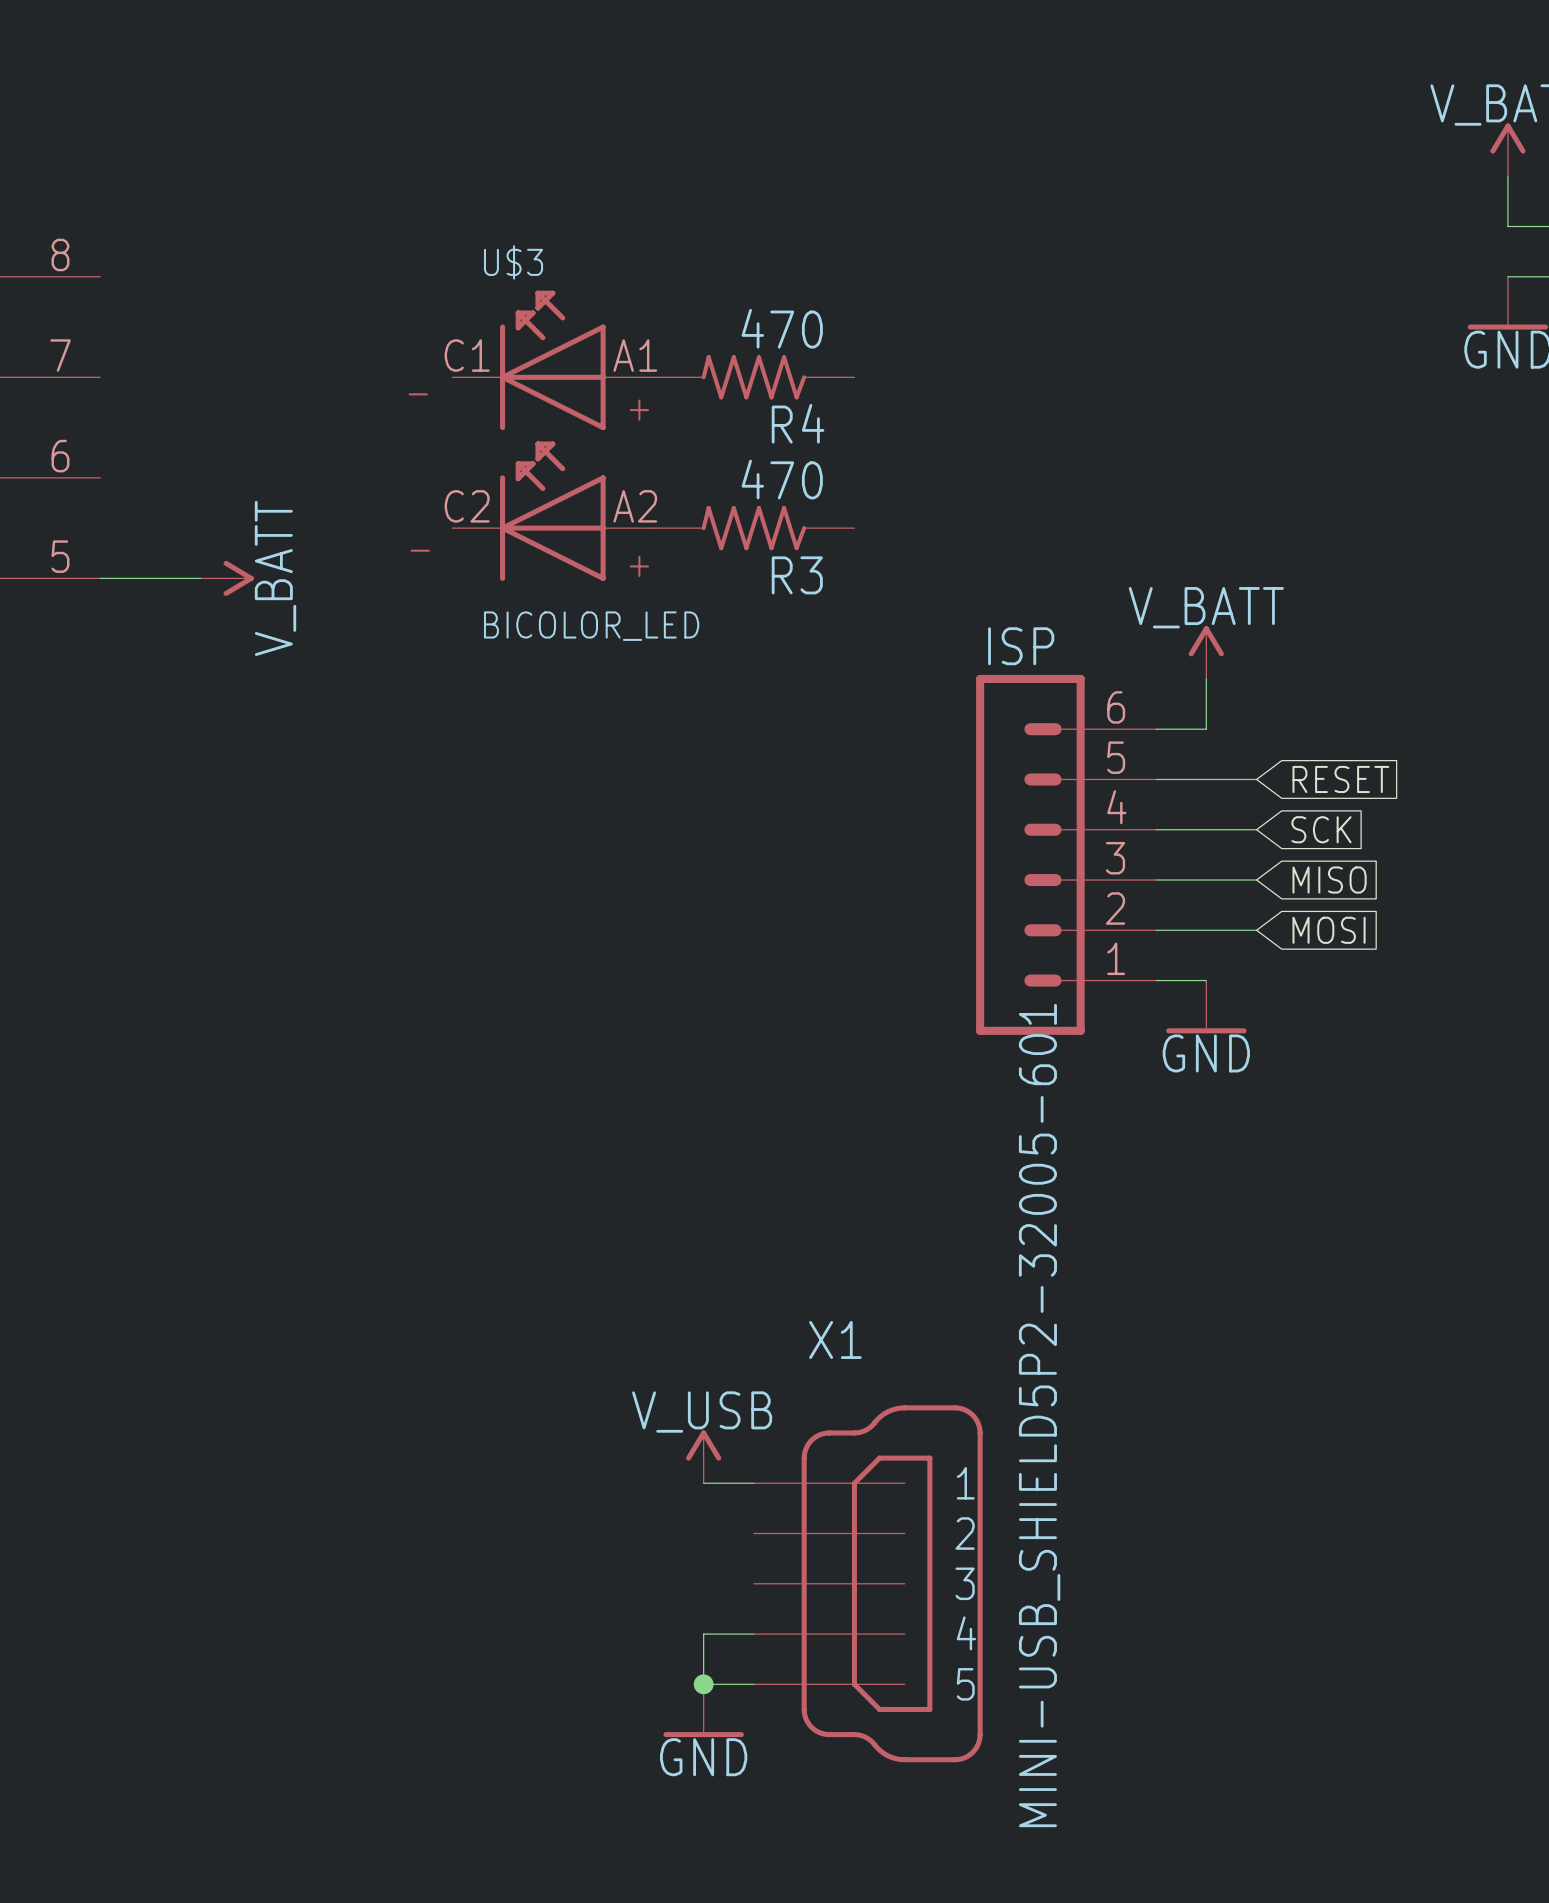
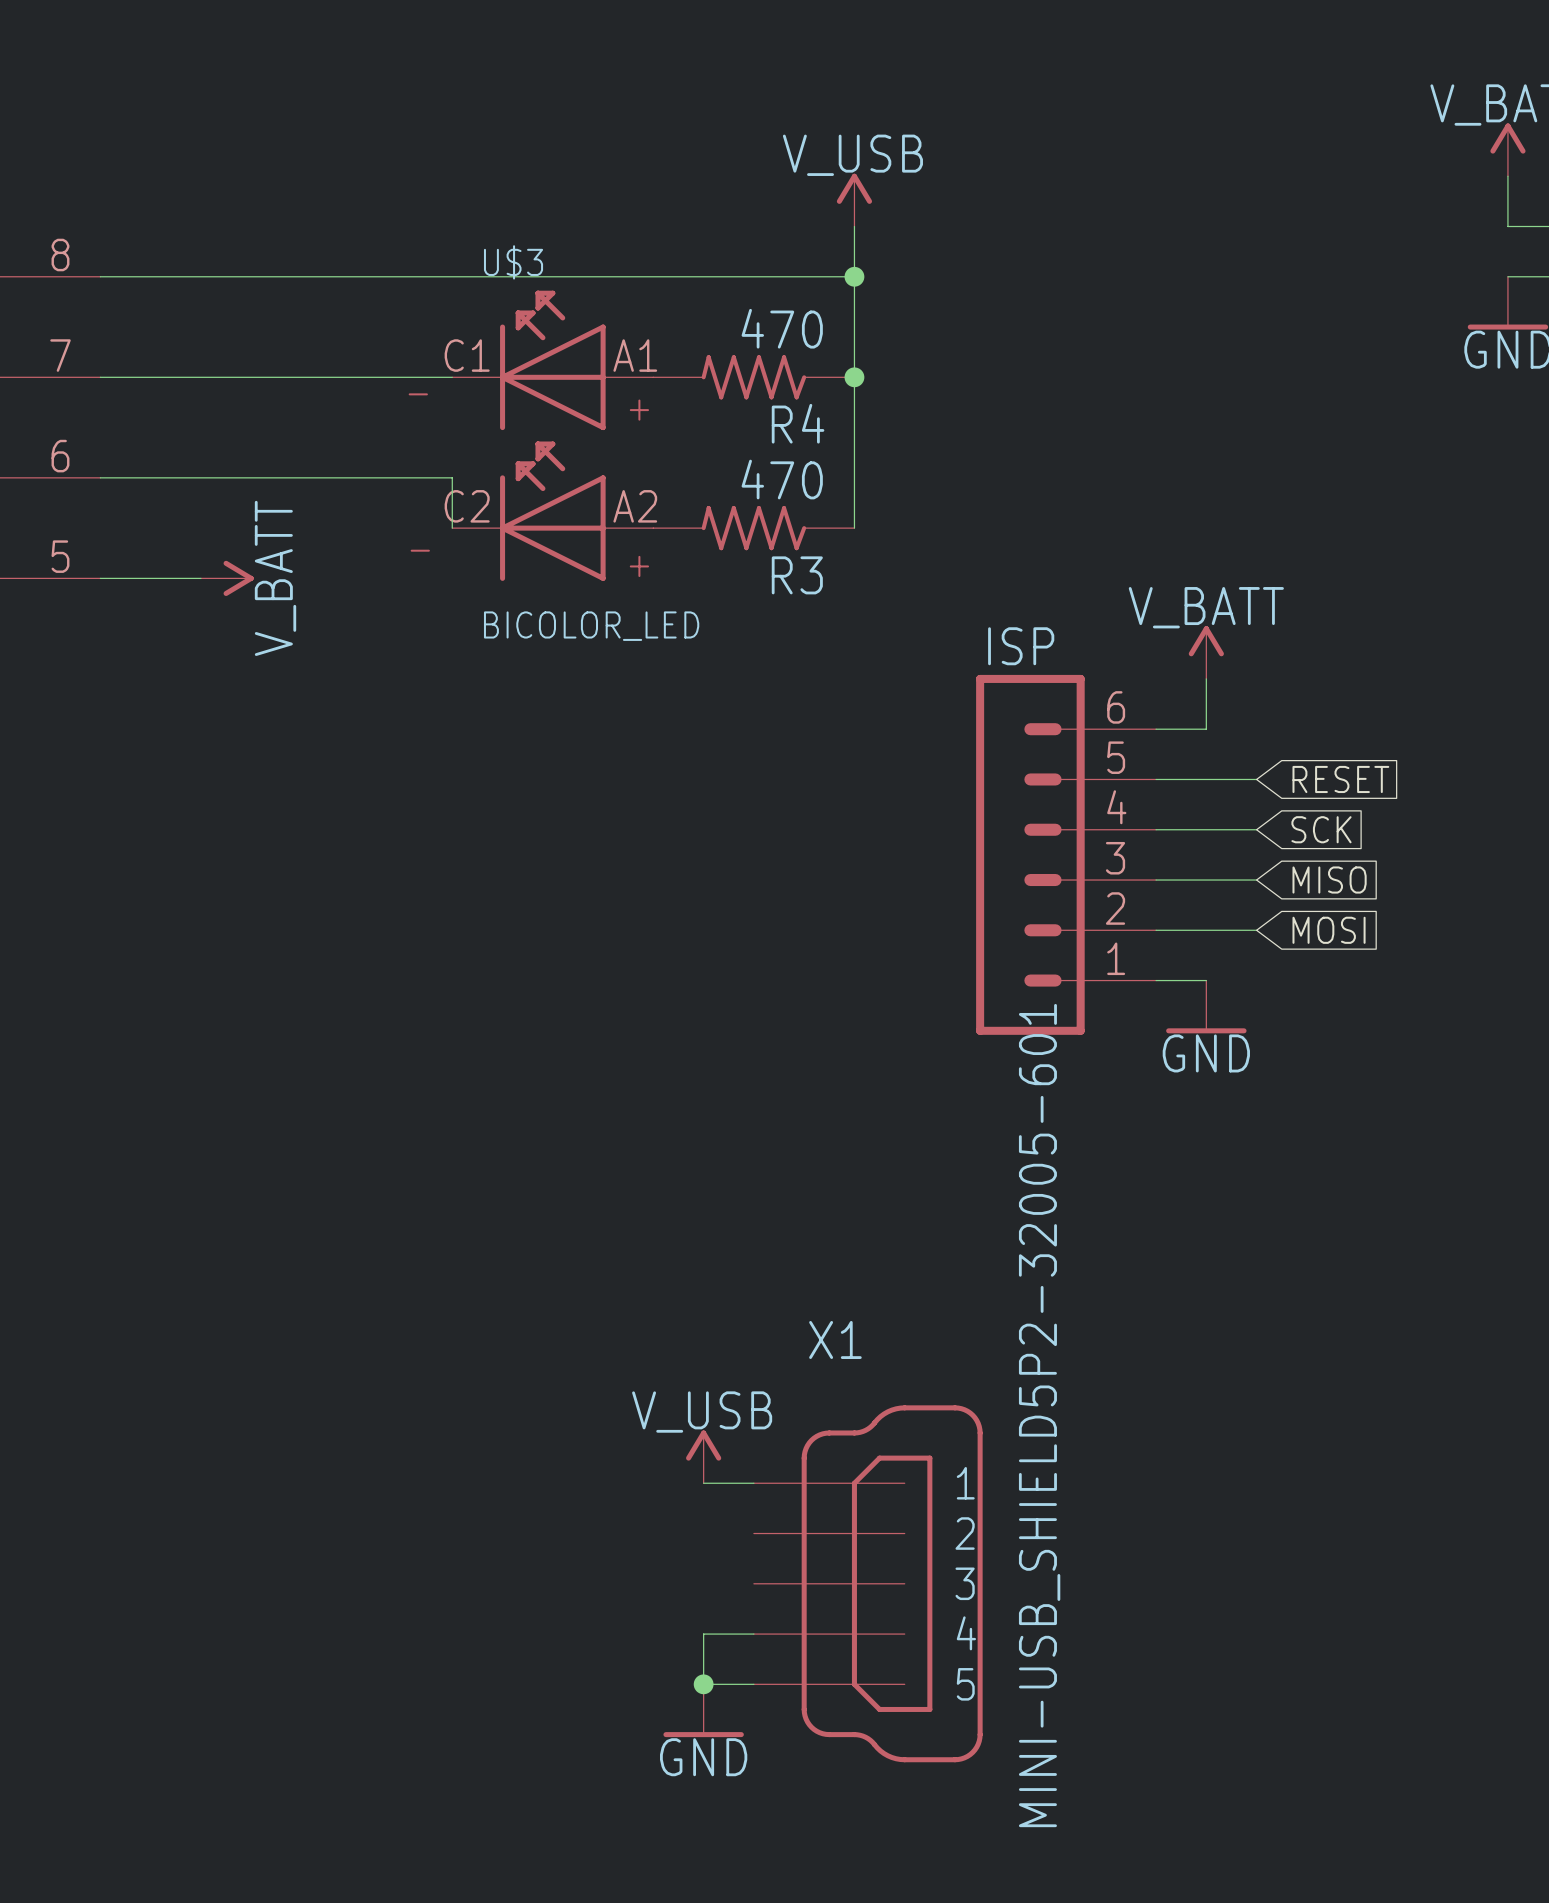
power symbol: none -> V_USB (854, 200)
wire: none -> (854, 226) (854, 528)
wire: none -> (100, 276) (854, 276)
junction: none -> (854, 276)
wire: none -> (100, 377) (452, 377)
junction: none -> (854, 377)
wire: none -> (100, 477) (452, 477) (452, 528)

